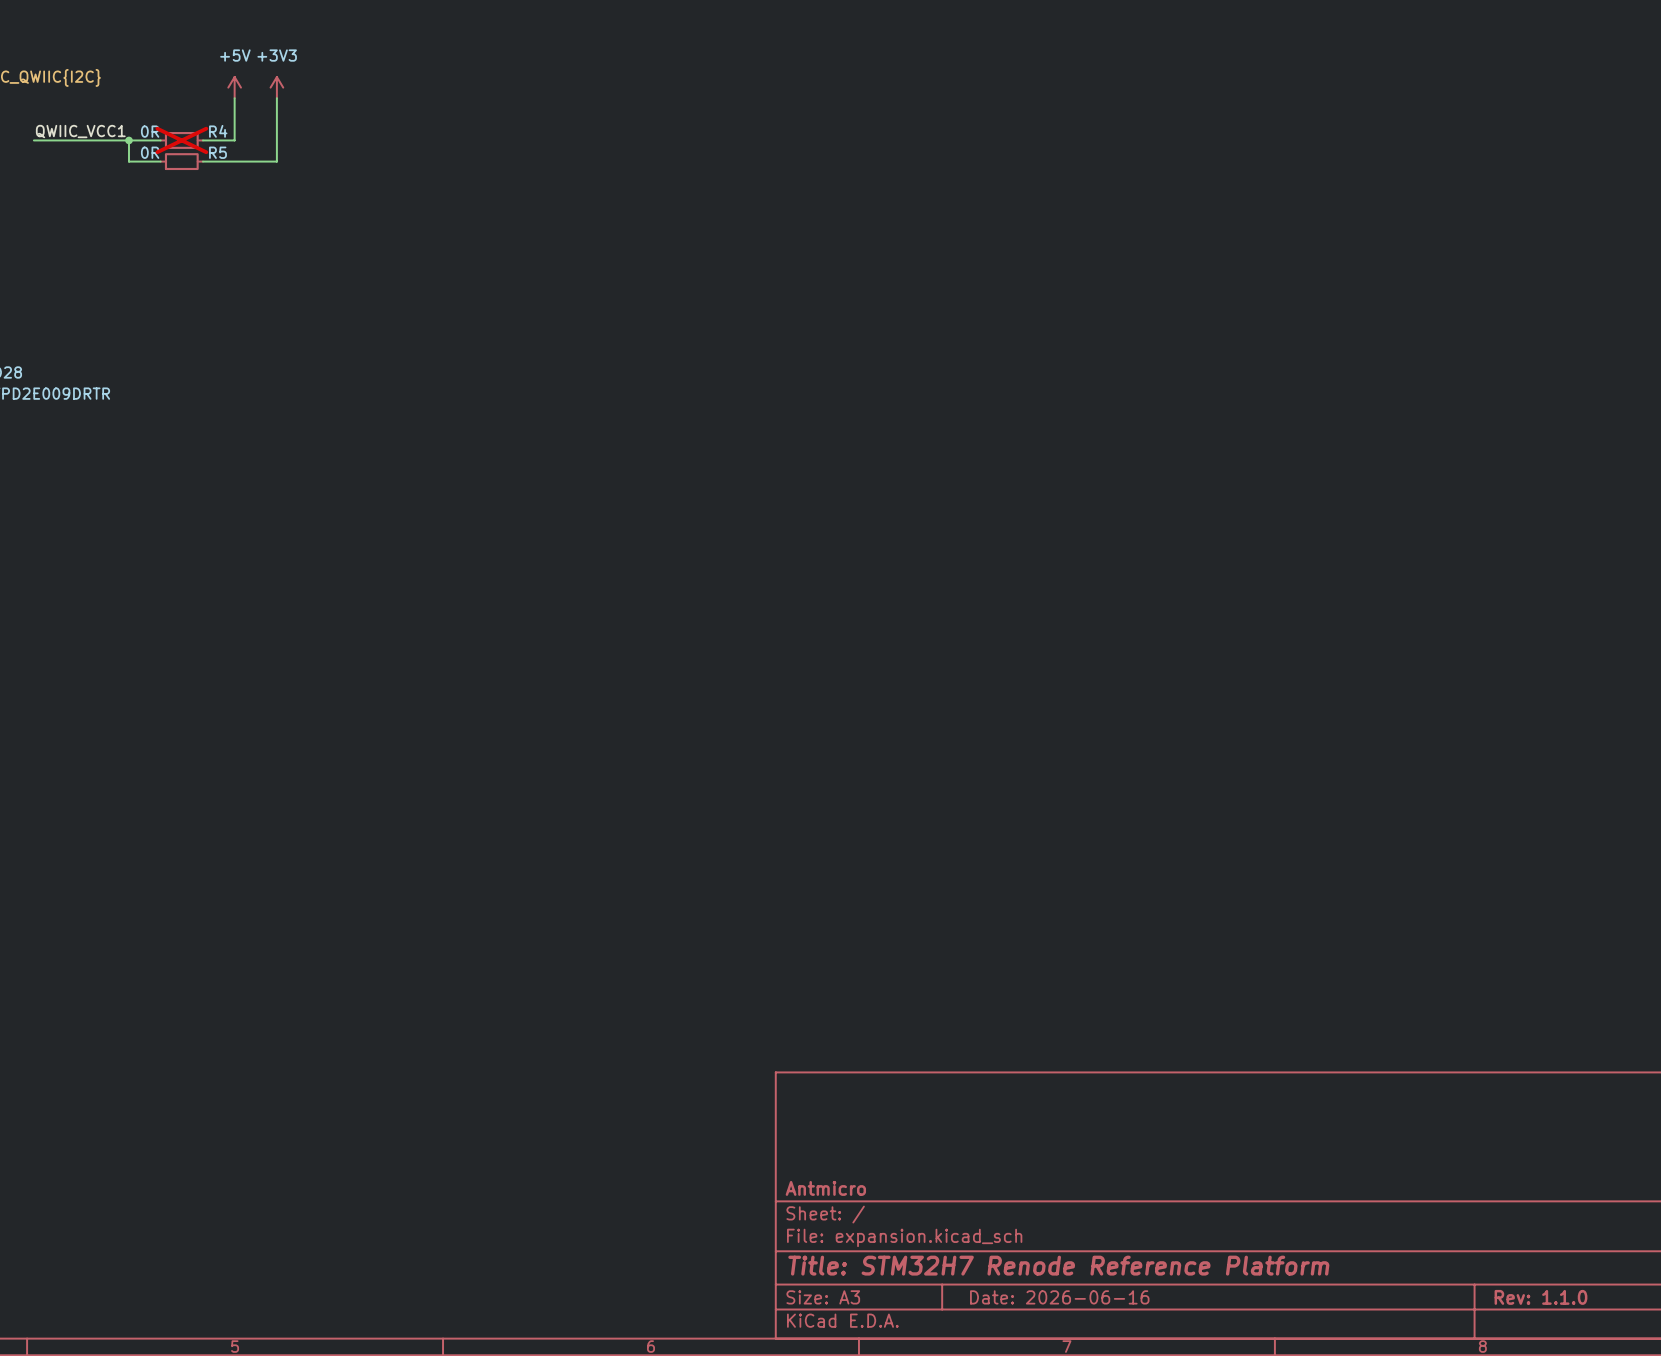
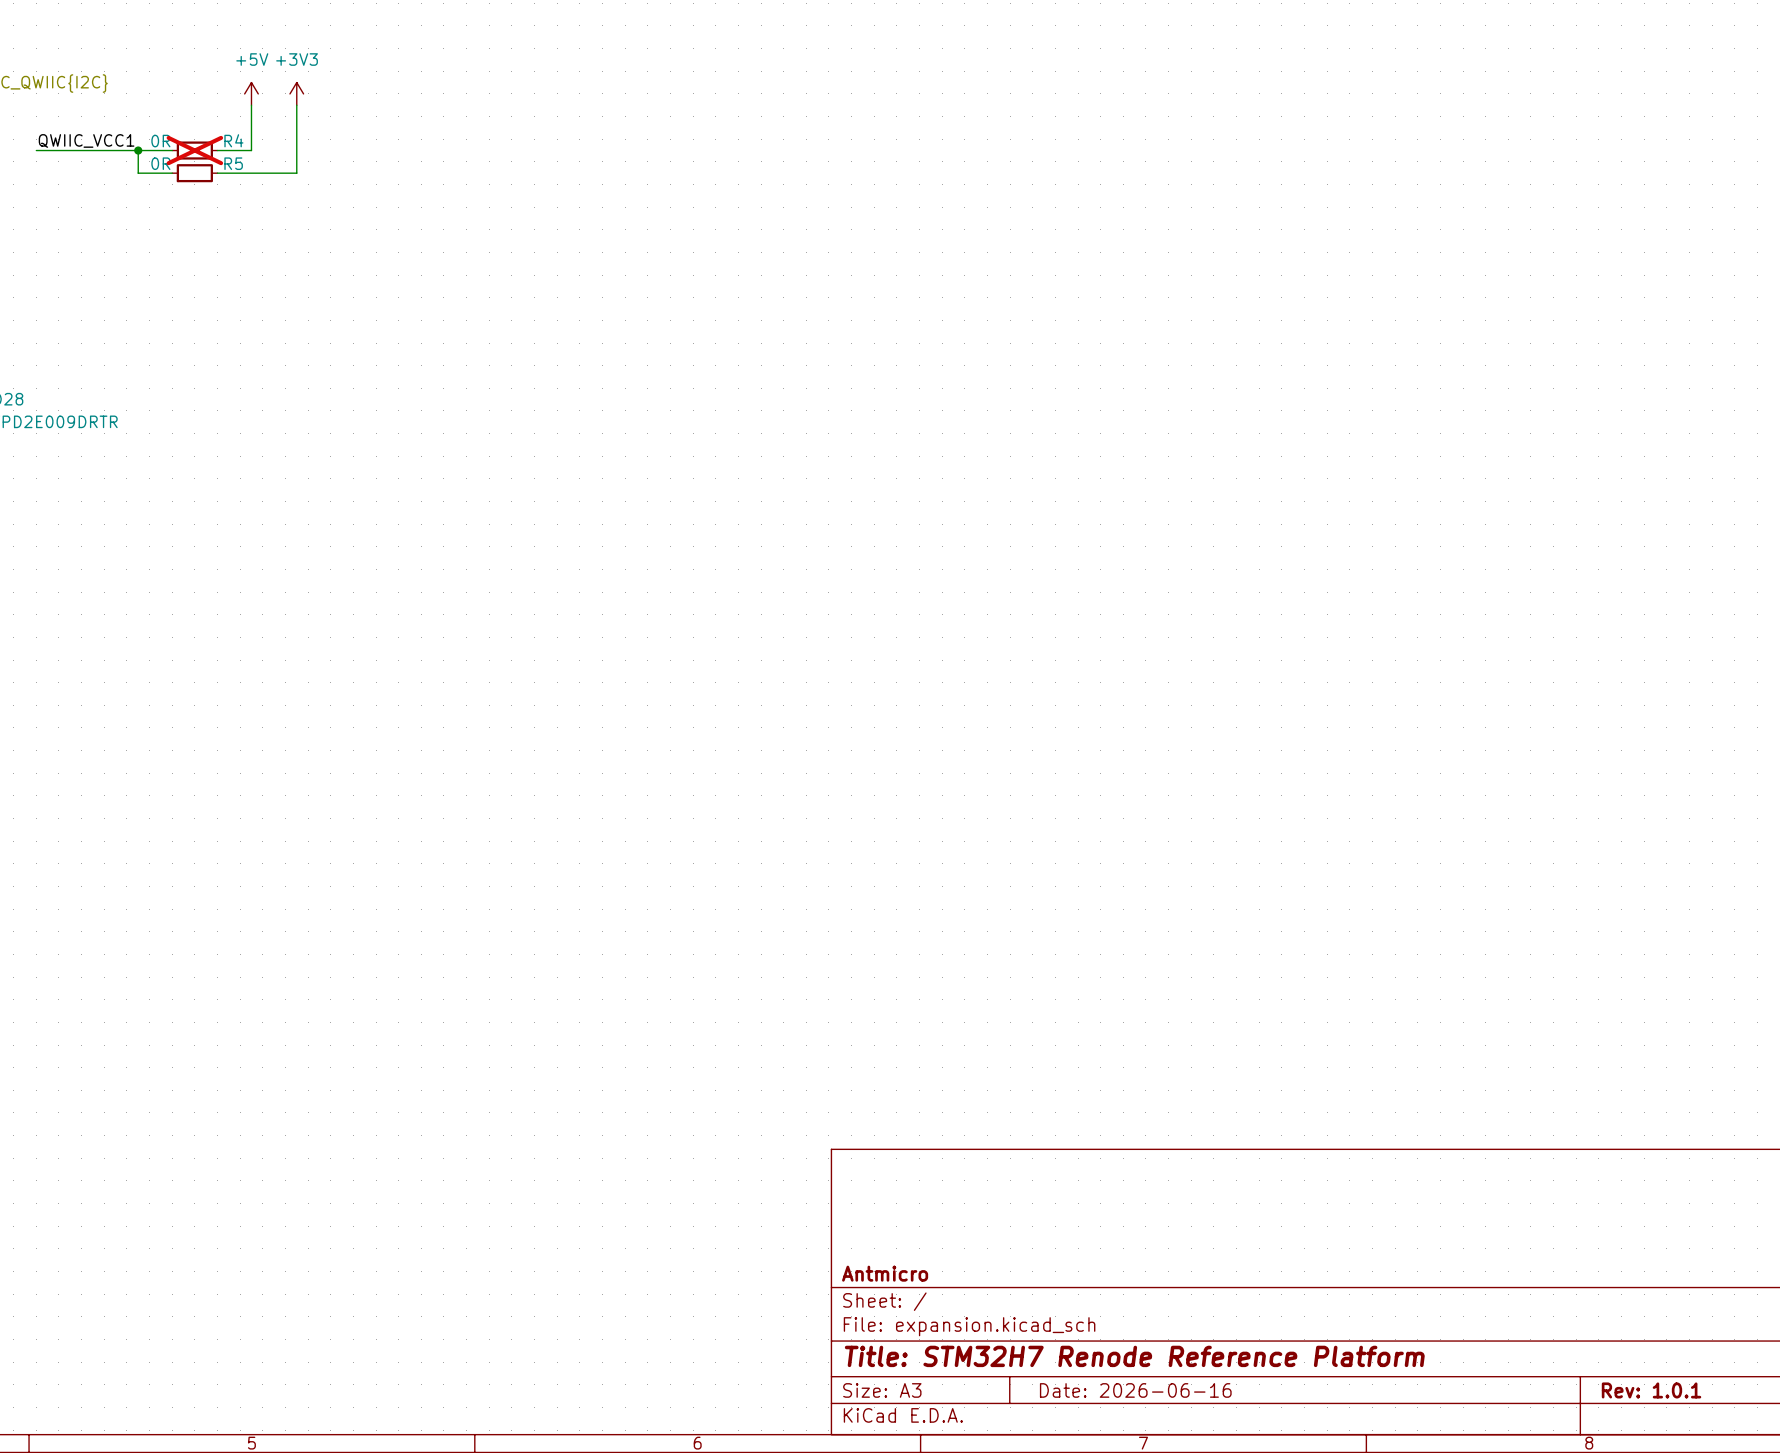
title block: Rev: 1.1.0 (1540, 1297) -> Rev: 1.0.1 (1651, 1390)

